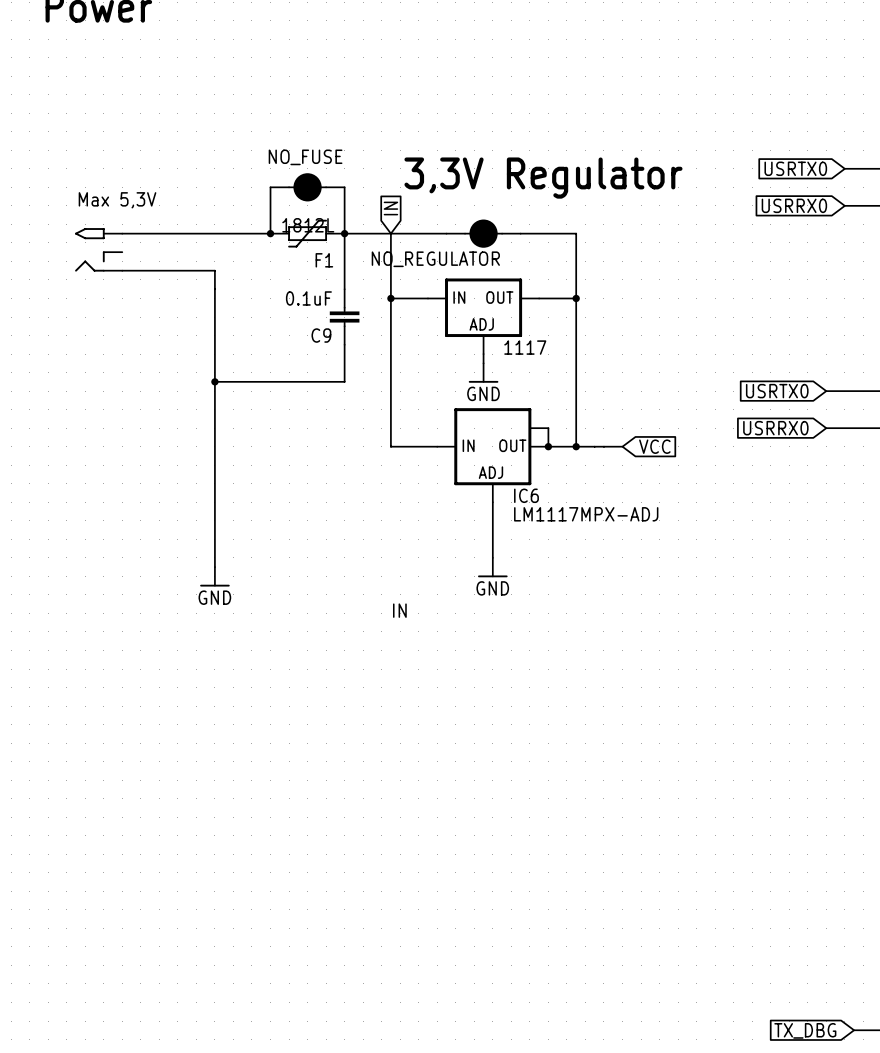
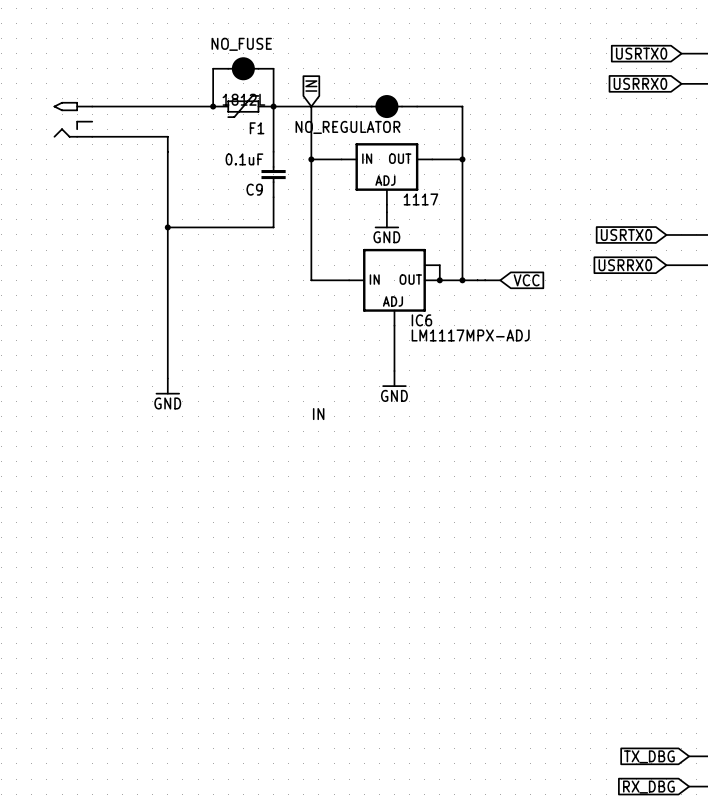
text: 3,3V Regulator (543, 178) -> none
text: Max 5,3V (117, 200) -> none

